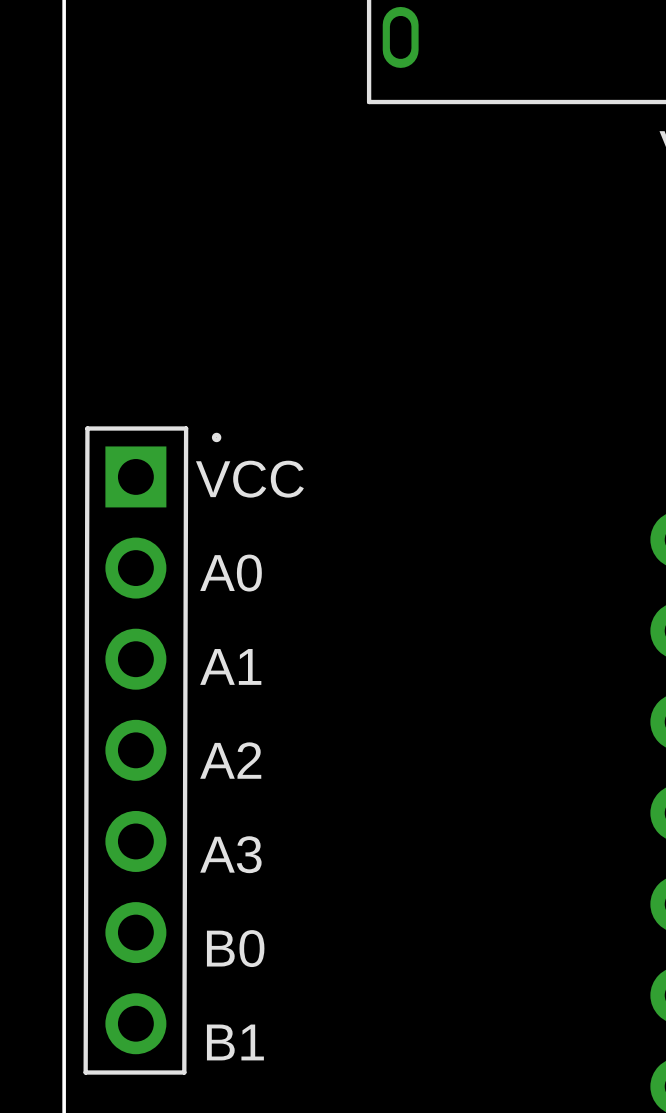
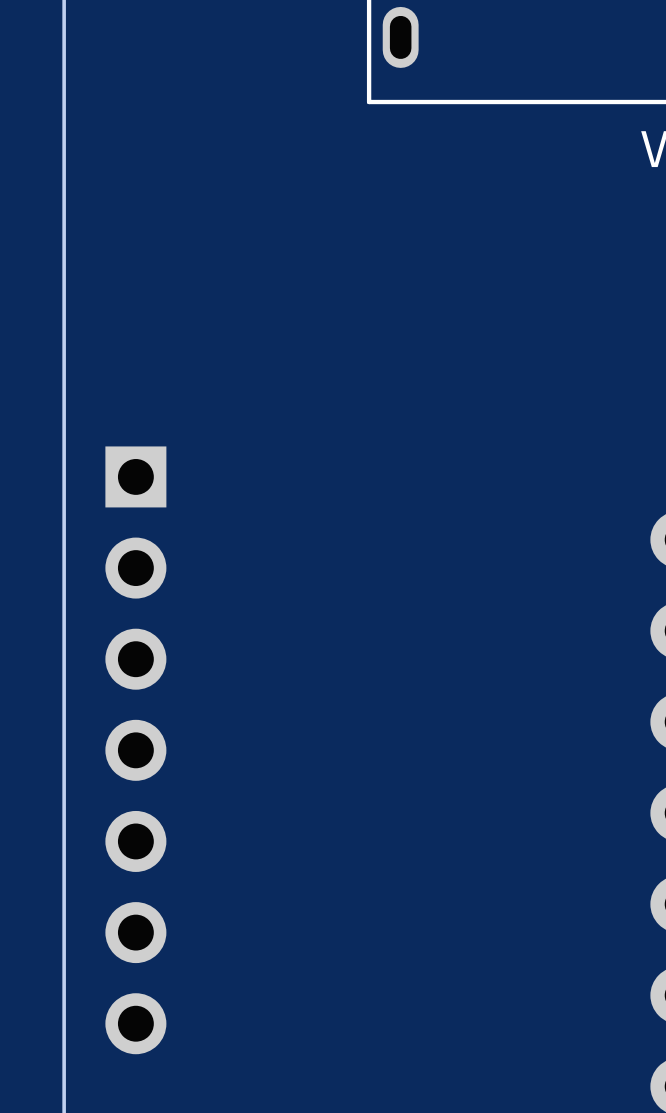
line: (186, 428) (87, 428) (85, 1072) (184, 1072) (186, 428) -> none
drawing: [211, 432, 222, 443] -> none
text: VCC (249, 479) -> none
text: A0 (231, 573) -> none
text: A1 (230, 666) -> none
text: A2 (230, 760) -> none
text: A3 (230, 854) -> none
text: B0 (235, 948) -> none
text: B1 (235, 1042) -> none

